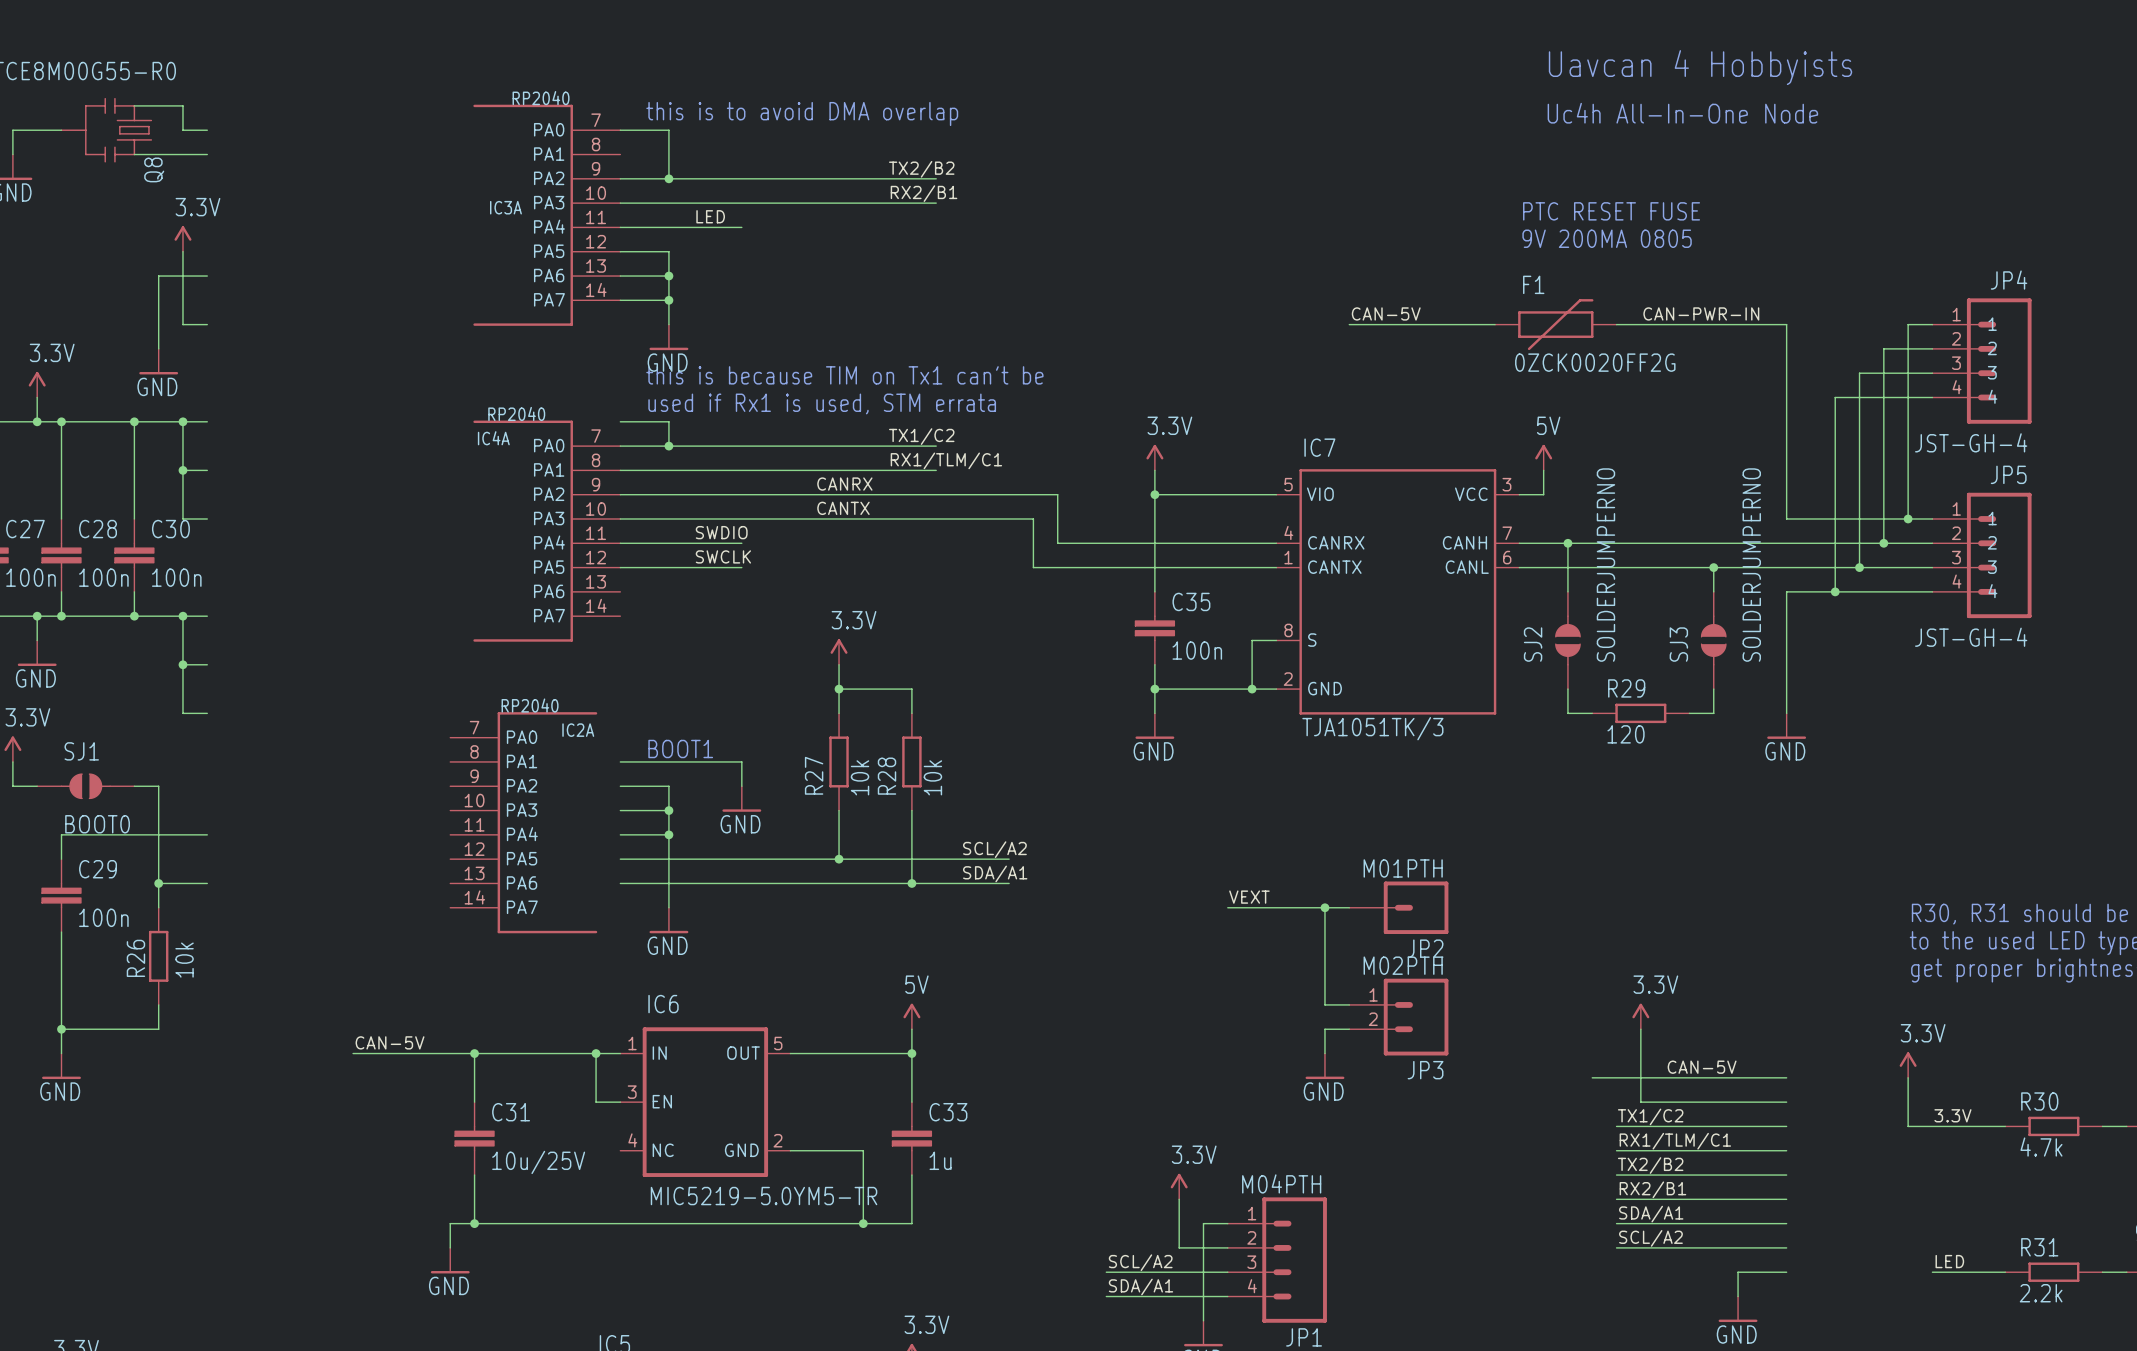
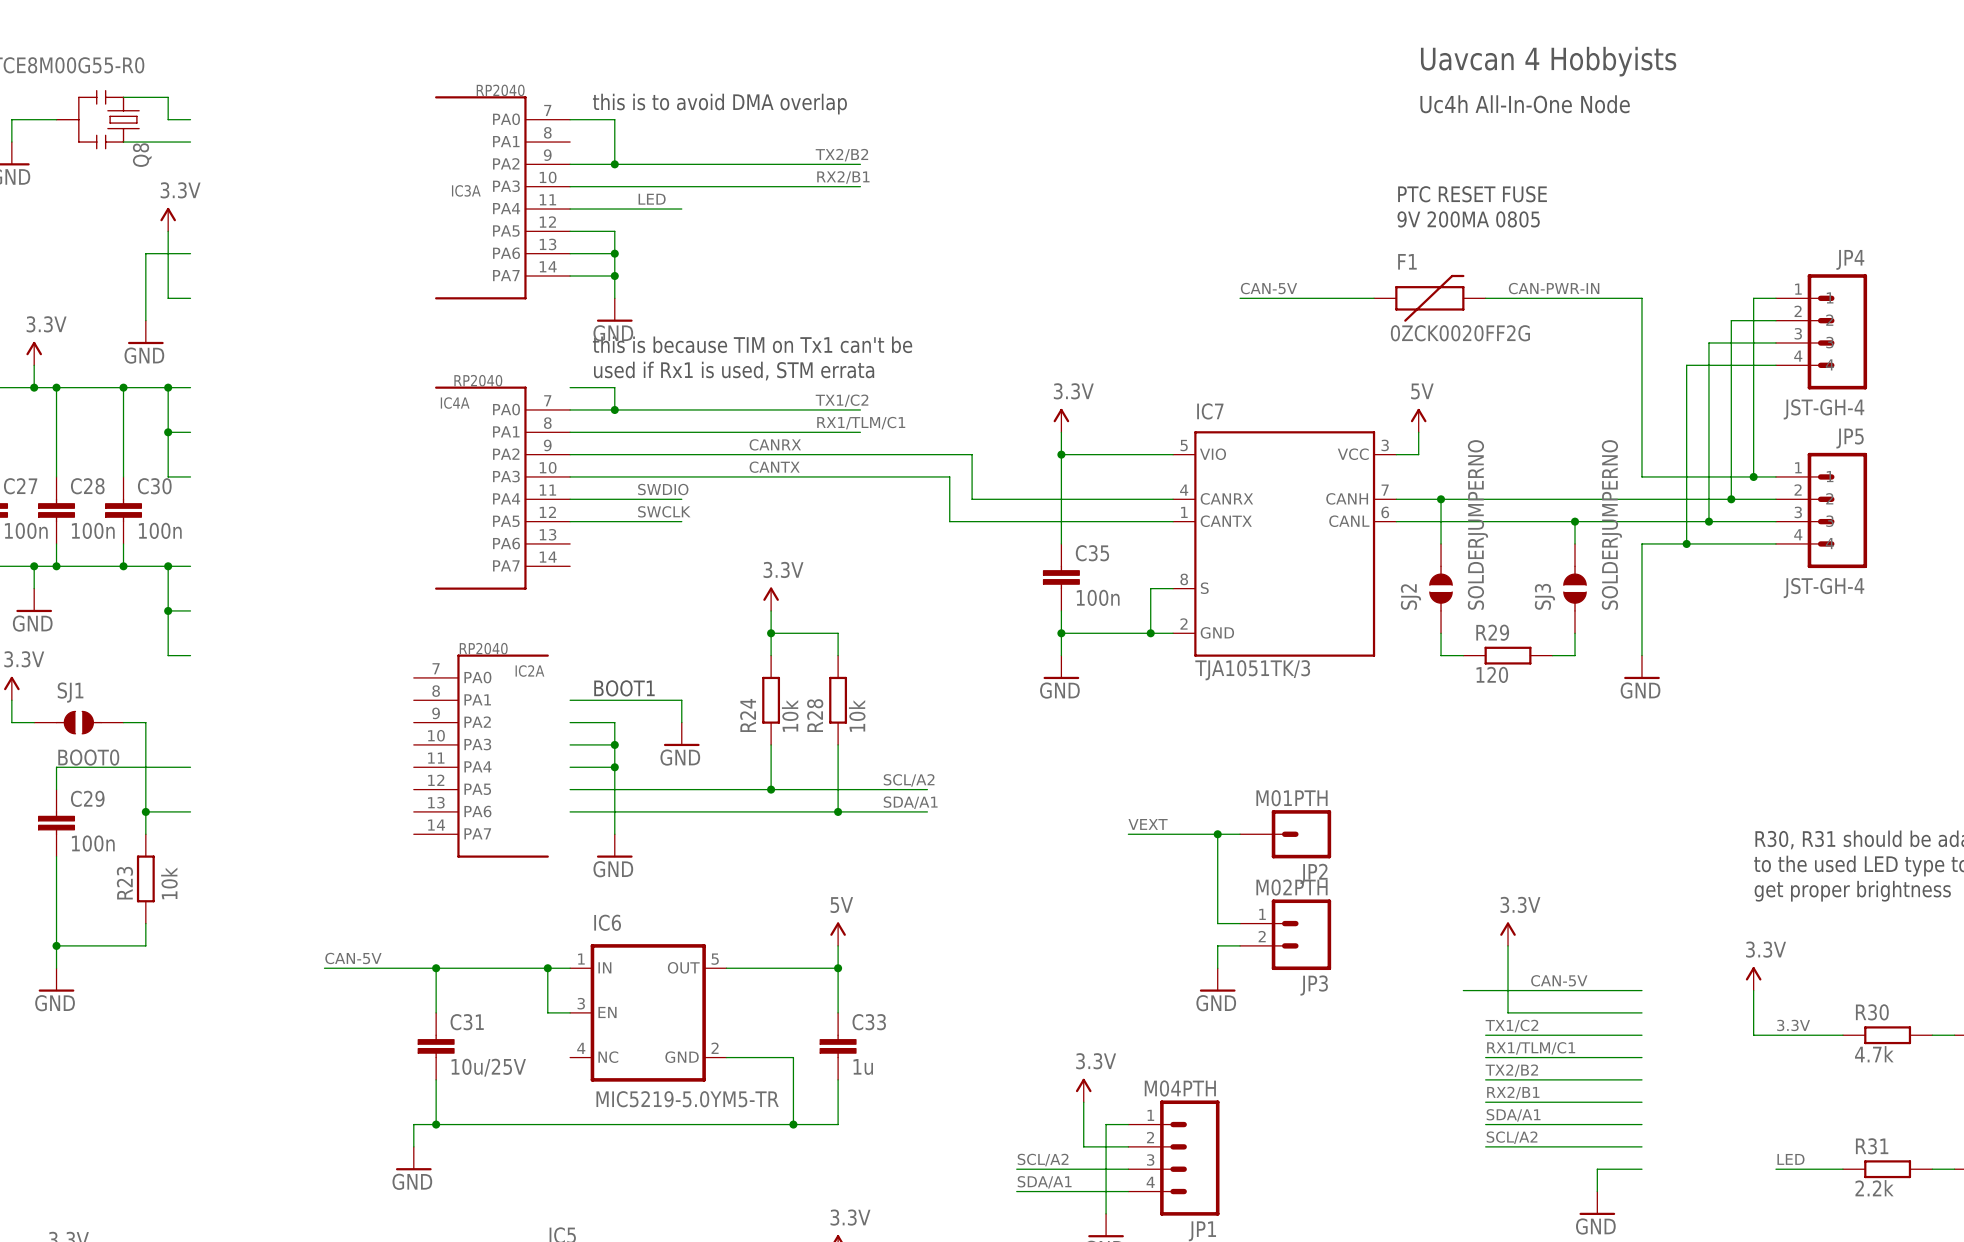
R27 name: R27 (814, 775) -> R24 (748, 715)
R26 name: R26 (135, 958) -> R23 (124, 883)

